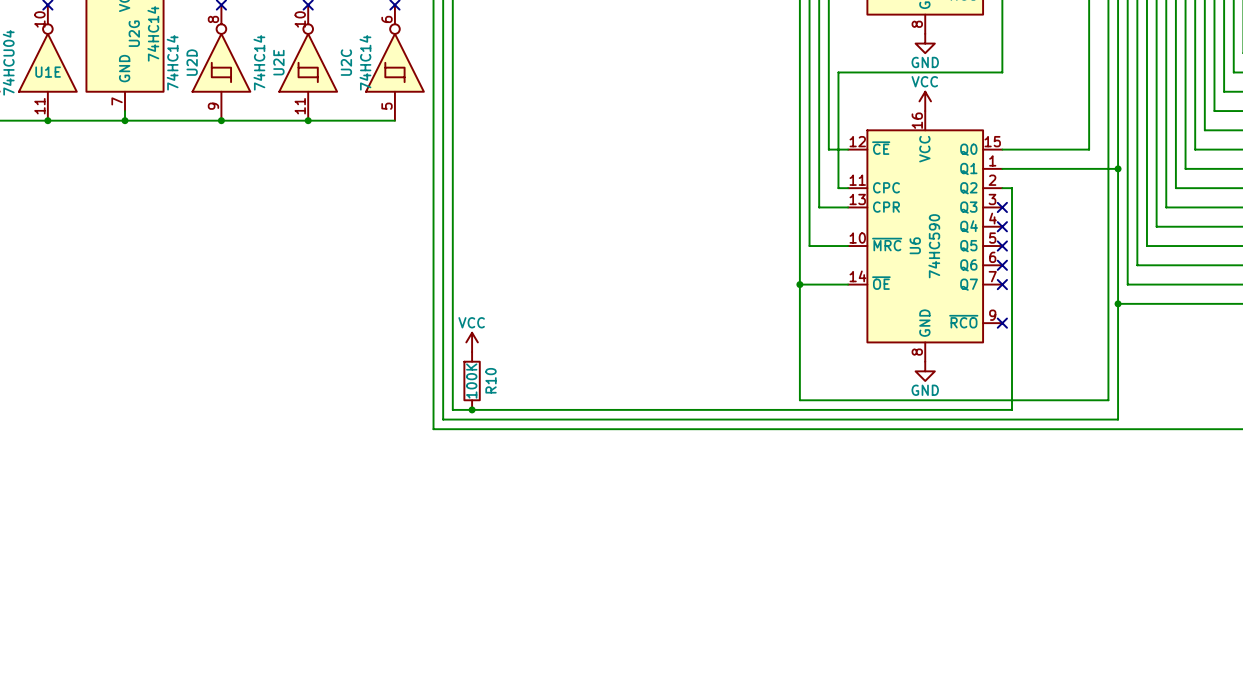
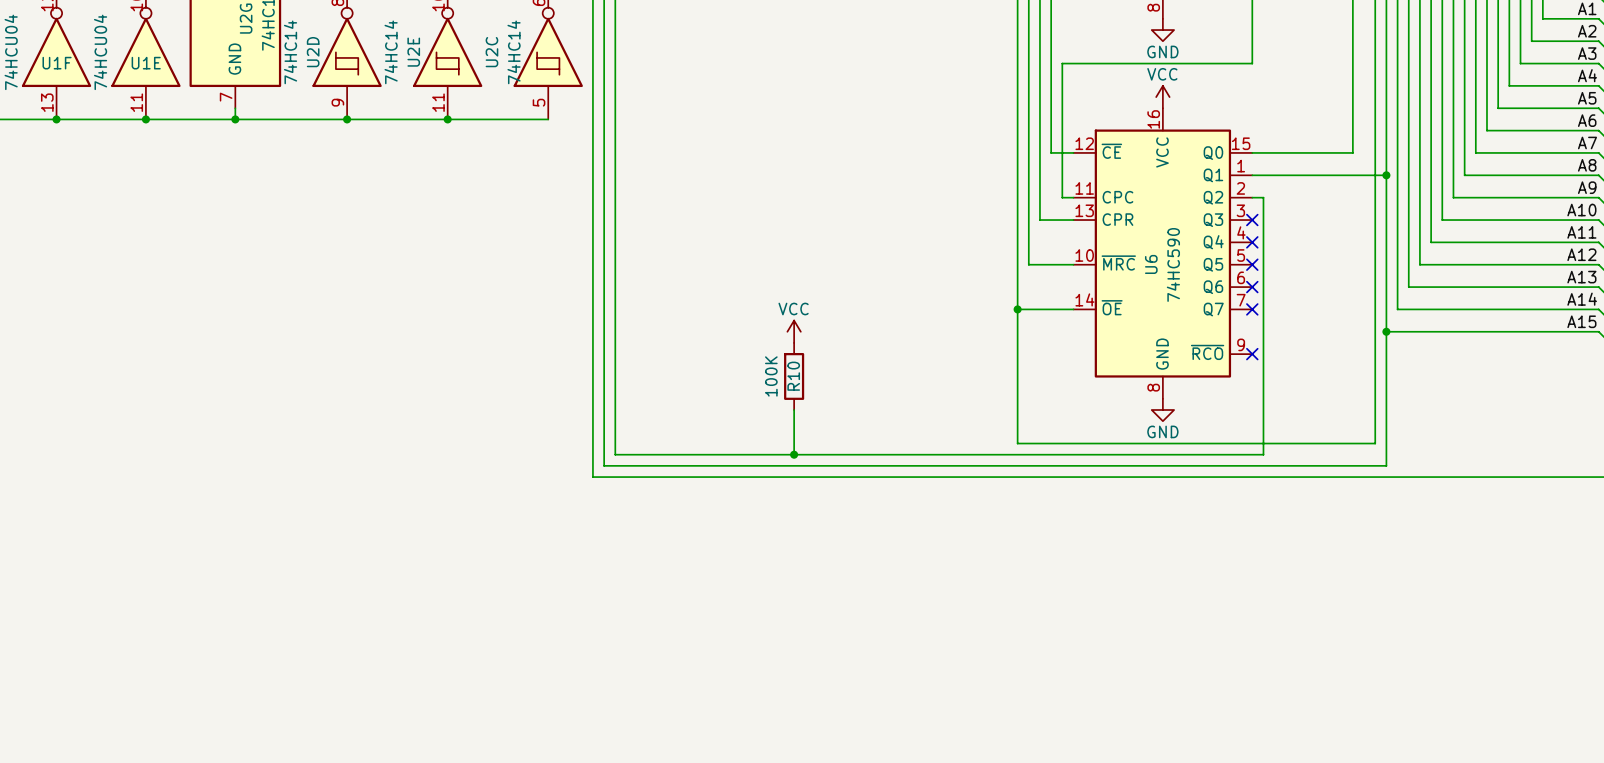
power symbol position: VCC (472, 342) -> VCC (794, 331)
wire: none -> (794, 410) (794, 454)
R10 value position: 100K (471, 380) -> 100K (771, 376)
R10 position: (472, 380) -> (794, 376)
R10 name position: R10 (491, 380) -> R10 (793, 376)
junction: (472, 409) -> none
junction: none -> (794, 454)

